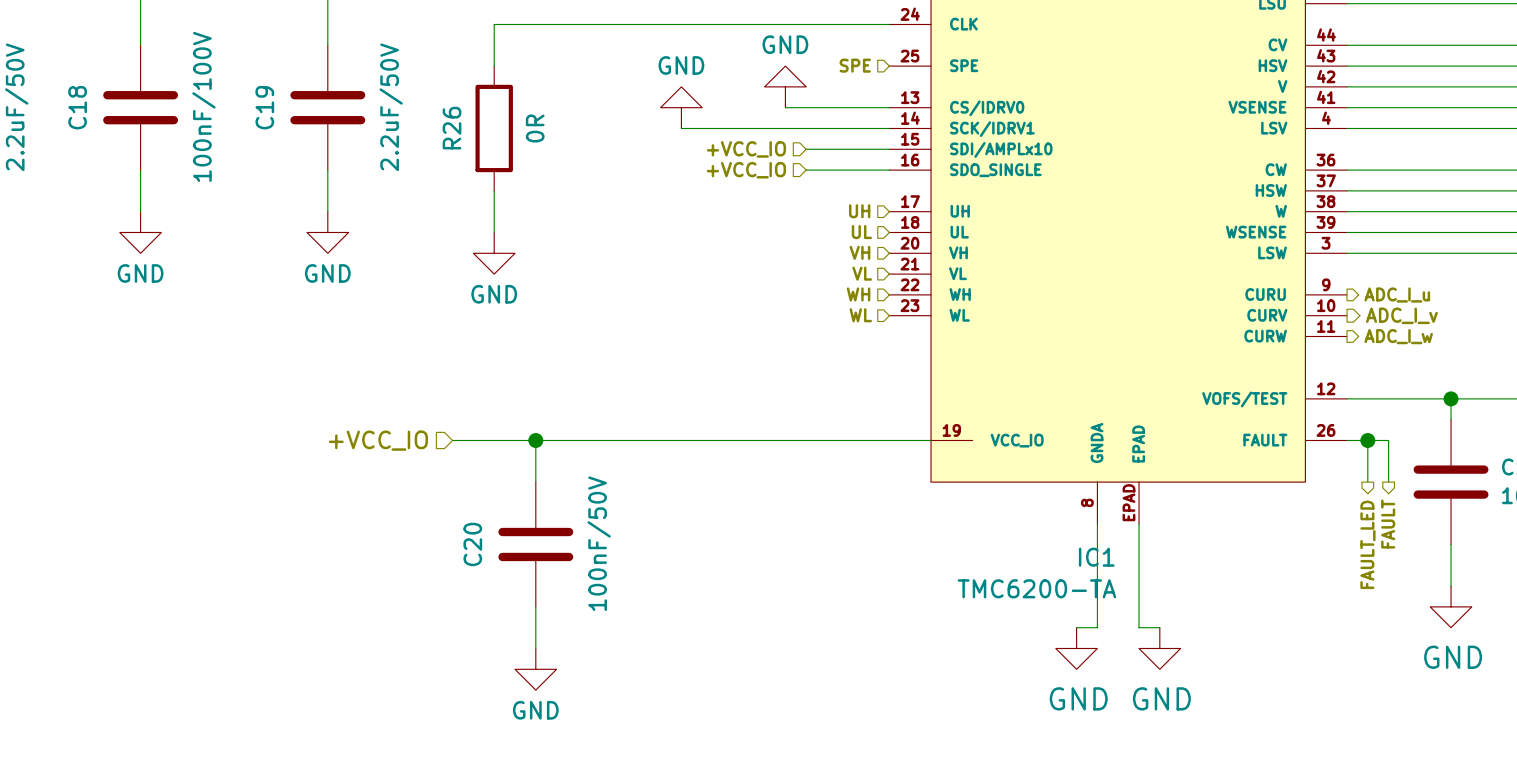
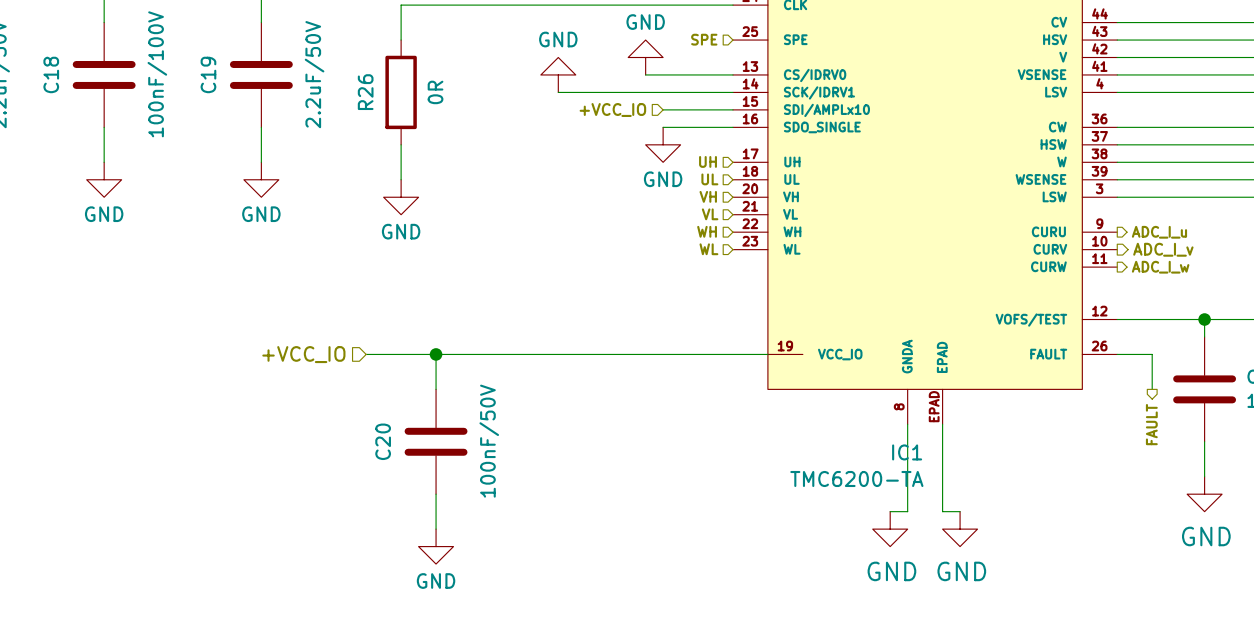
hierarchical label: +VCC_IO (746, 170) -> none
power symbol: none -> GND (663, 144)
wire: (1367, 440) (1367, 482) -> none
junction: (1367, 440) -> none
hierarchical label: FAULT_LED (1367, 544) -> none

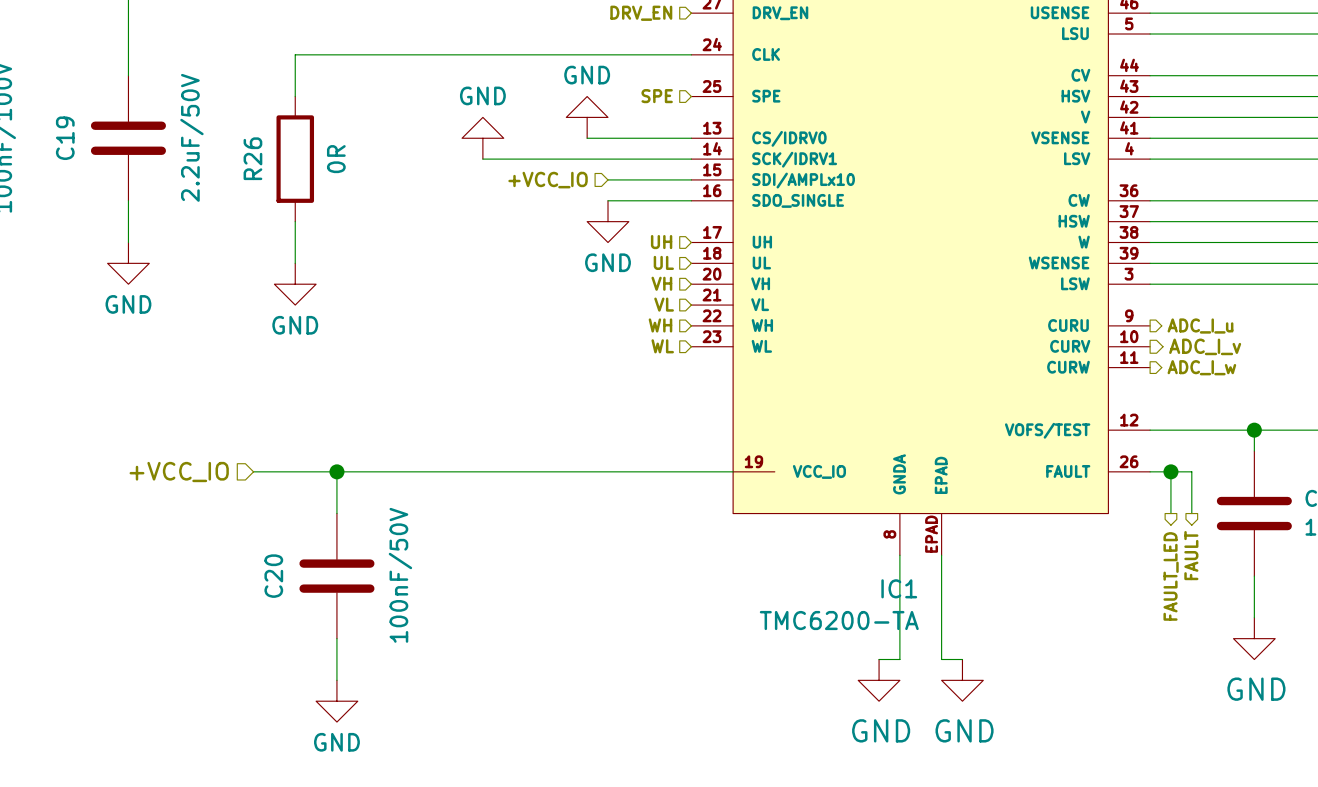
wire: none -> (1170, 471) (1170, 513)
junction: none -> (1170, 471)
hierarchical label: none -> FAULT_LED (1171, 576)

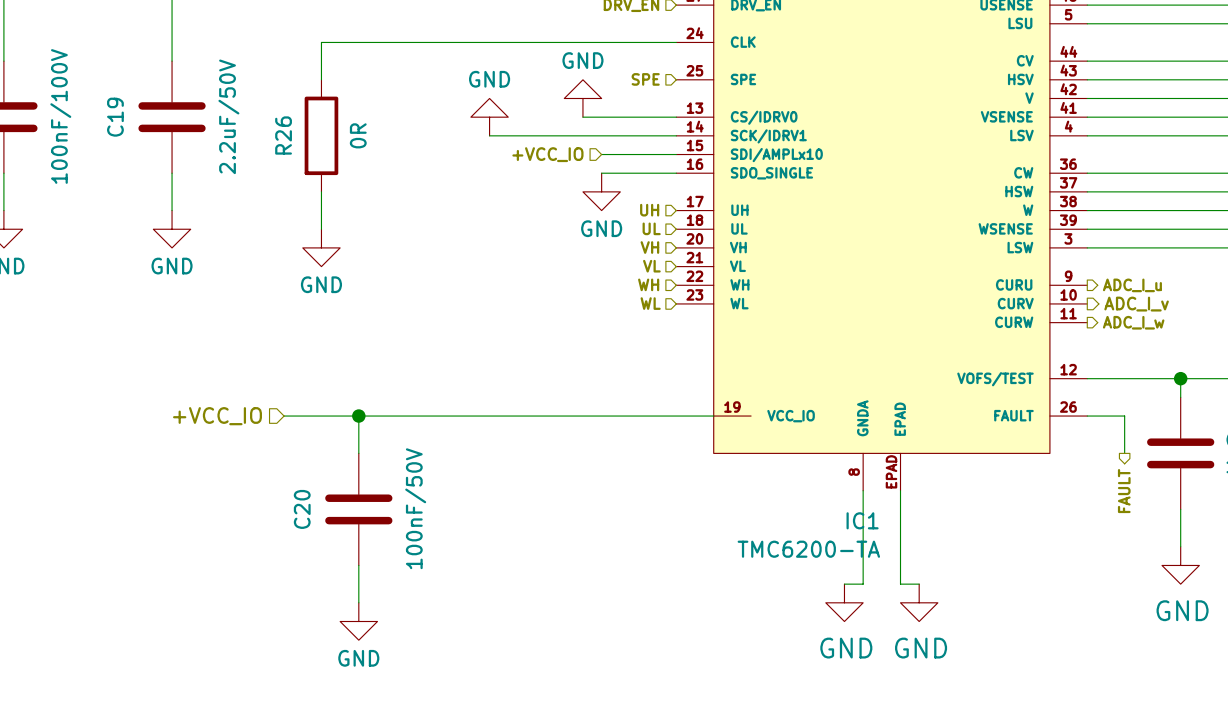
wire: (1170, 471) (1170, 513) -> none
junction: (1170, 471) -> none
hierarchical label: FAULT_LED (1171, 576) -> none

